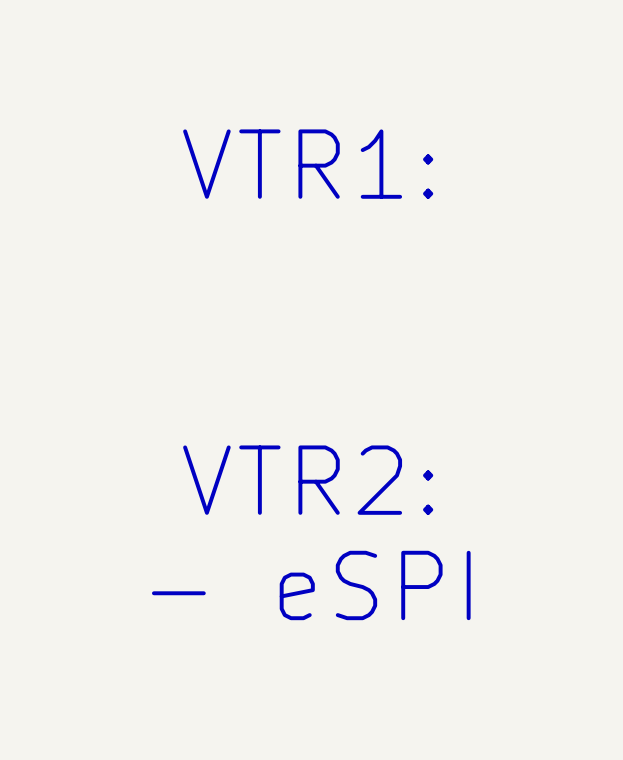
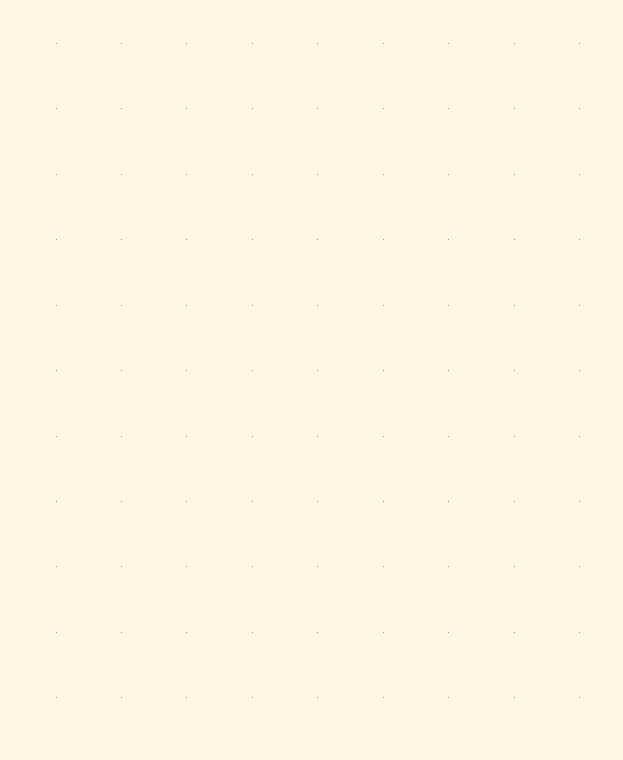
text: VTR1: (308, 164) -> none
text: VTR2: (308, 480) -> none
text: - eSPI (311, 585) -> none

